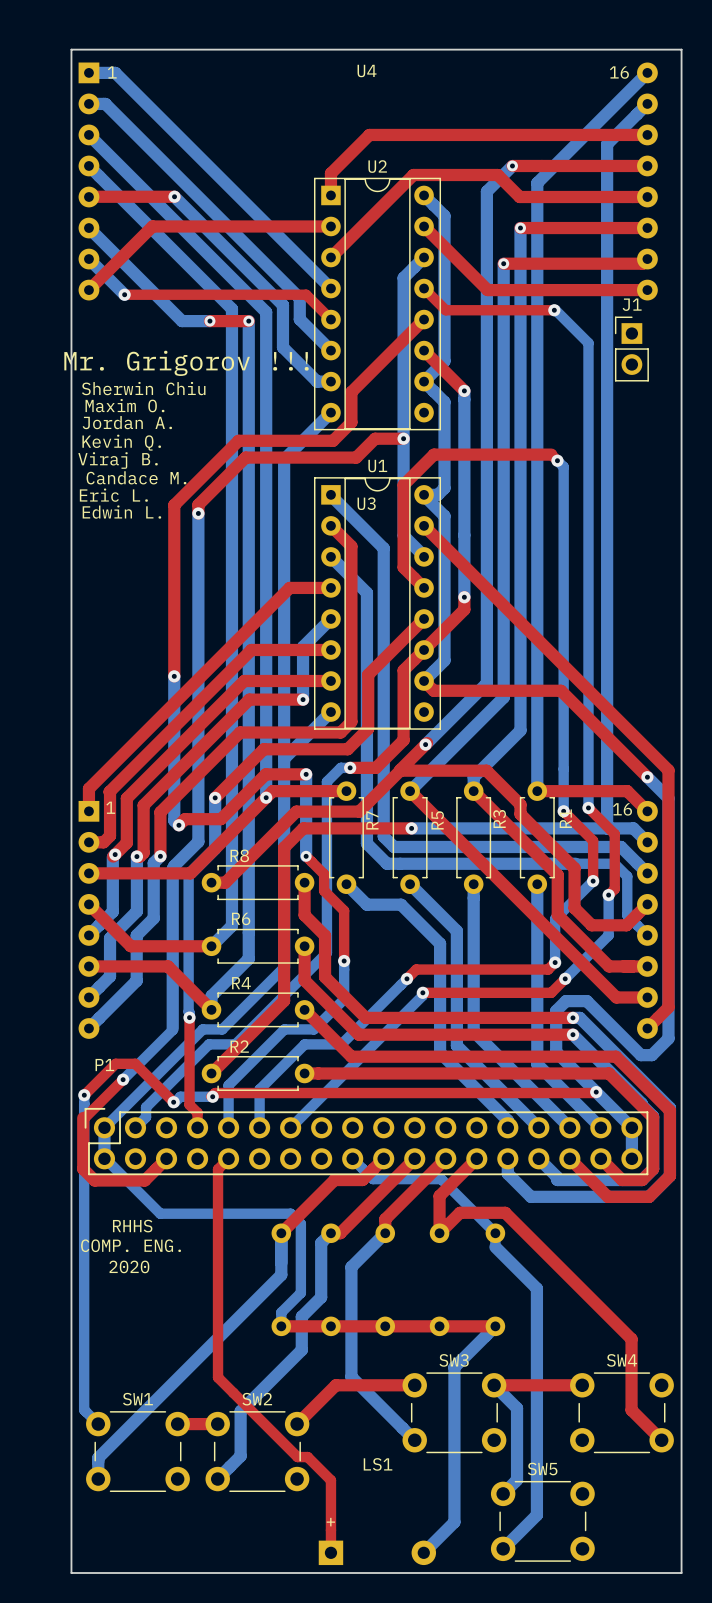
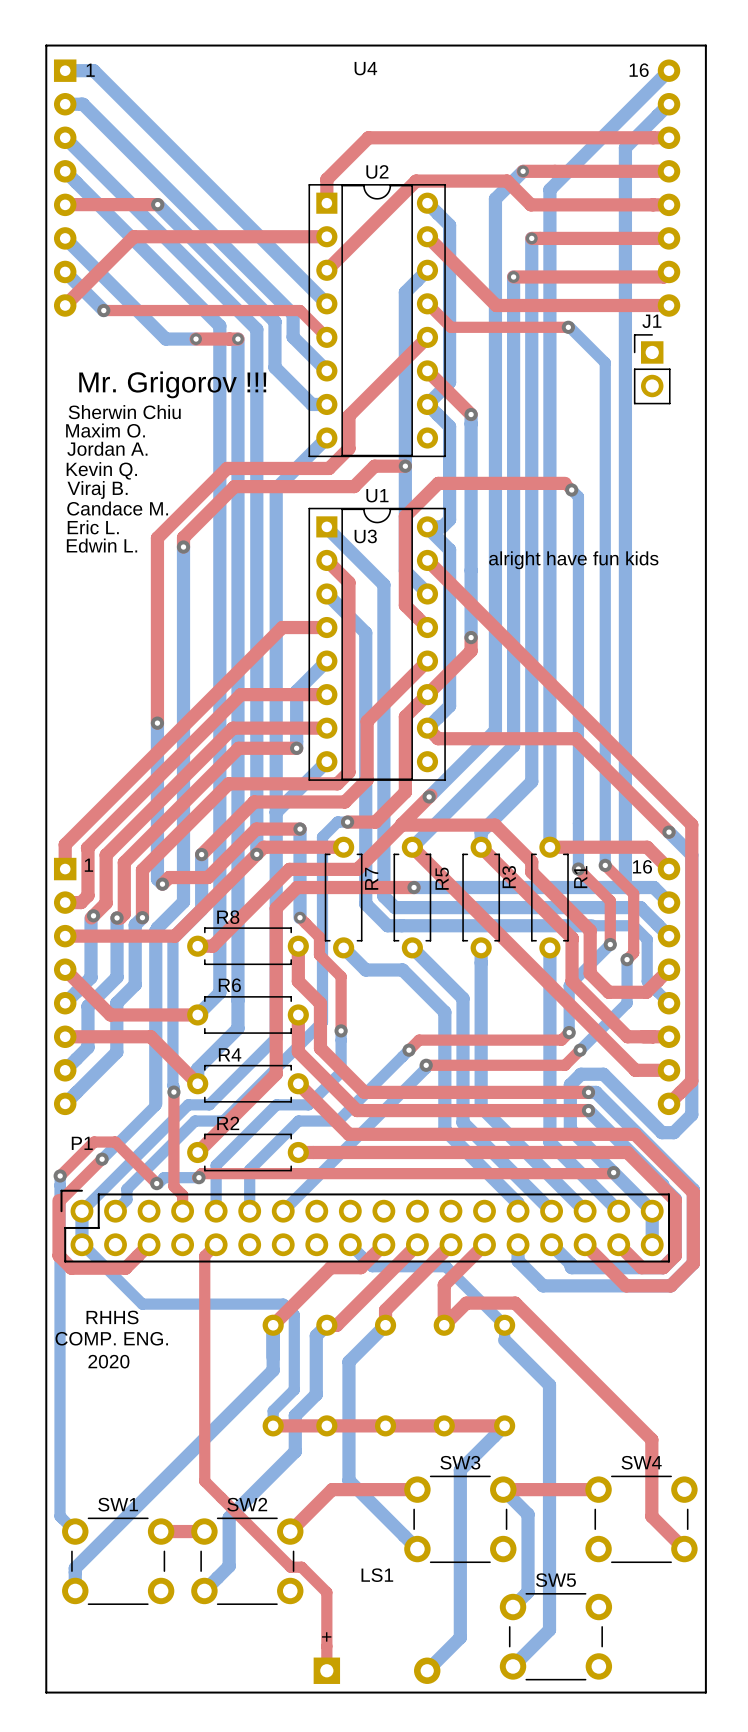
text: none -> alright have fun kids (573, 560)

